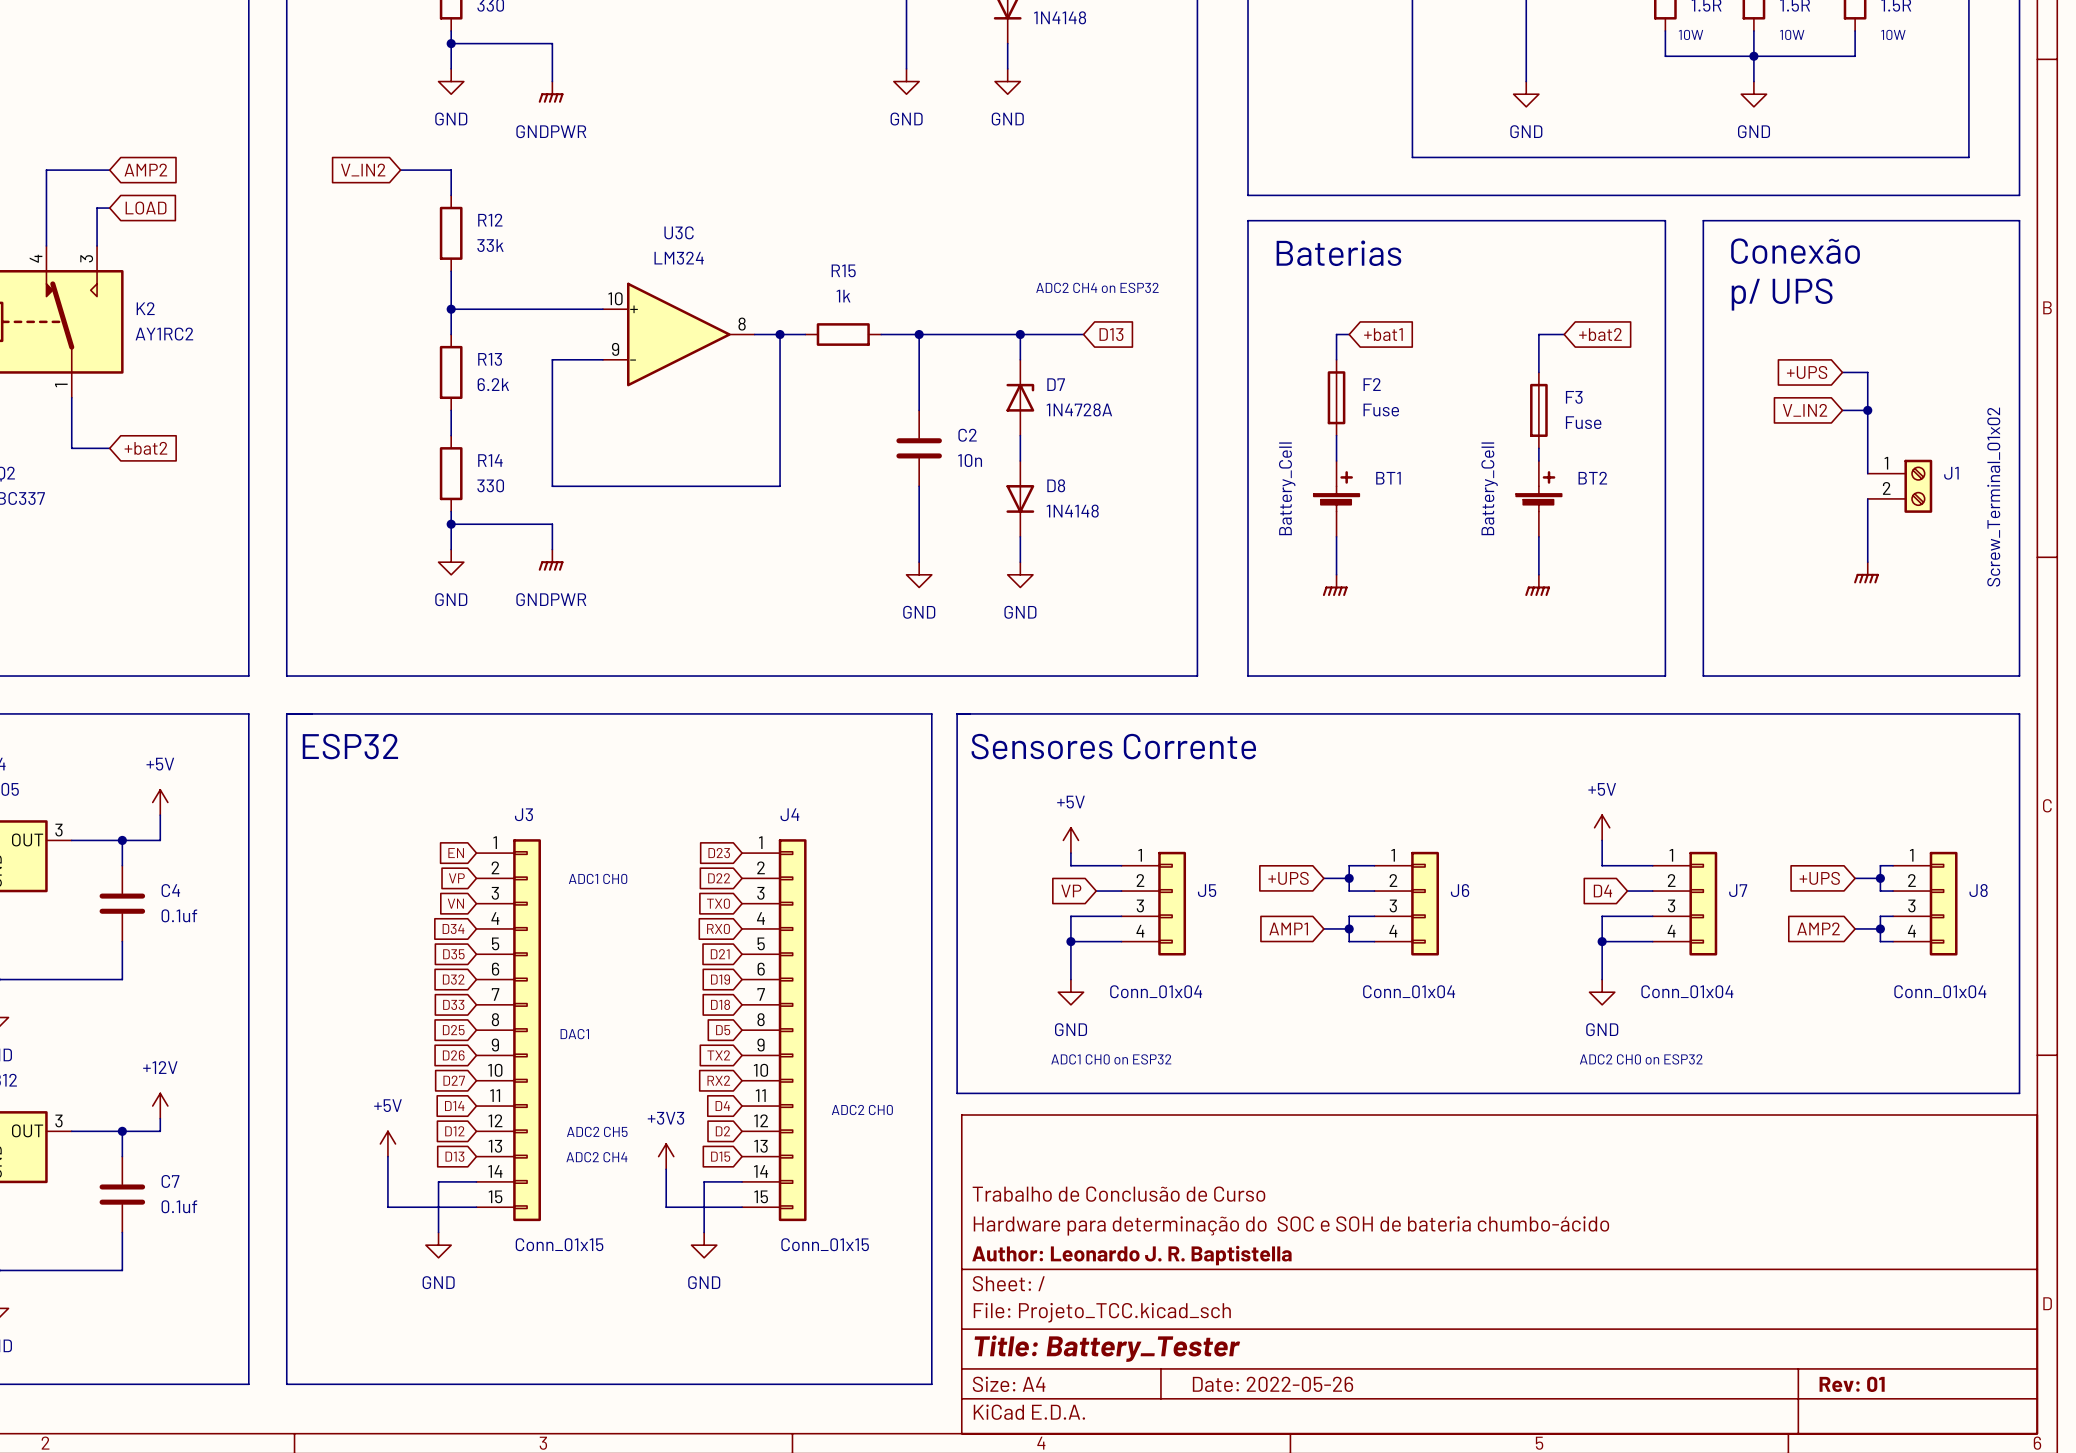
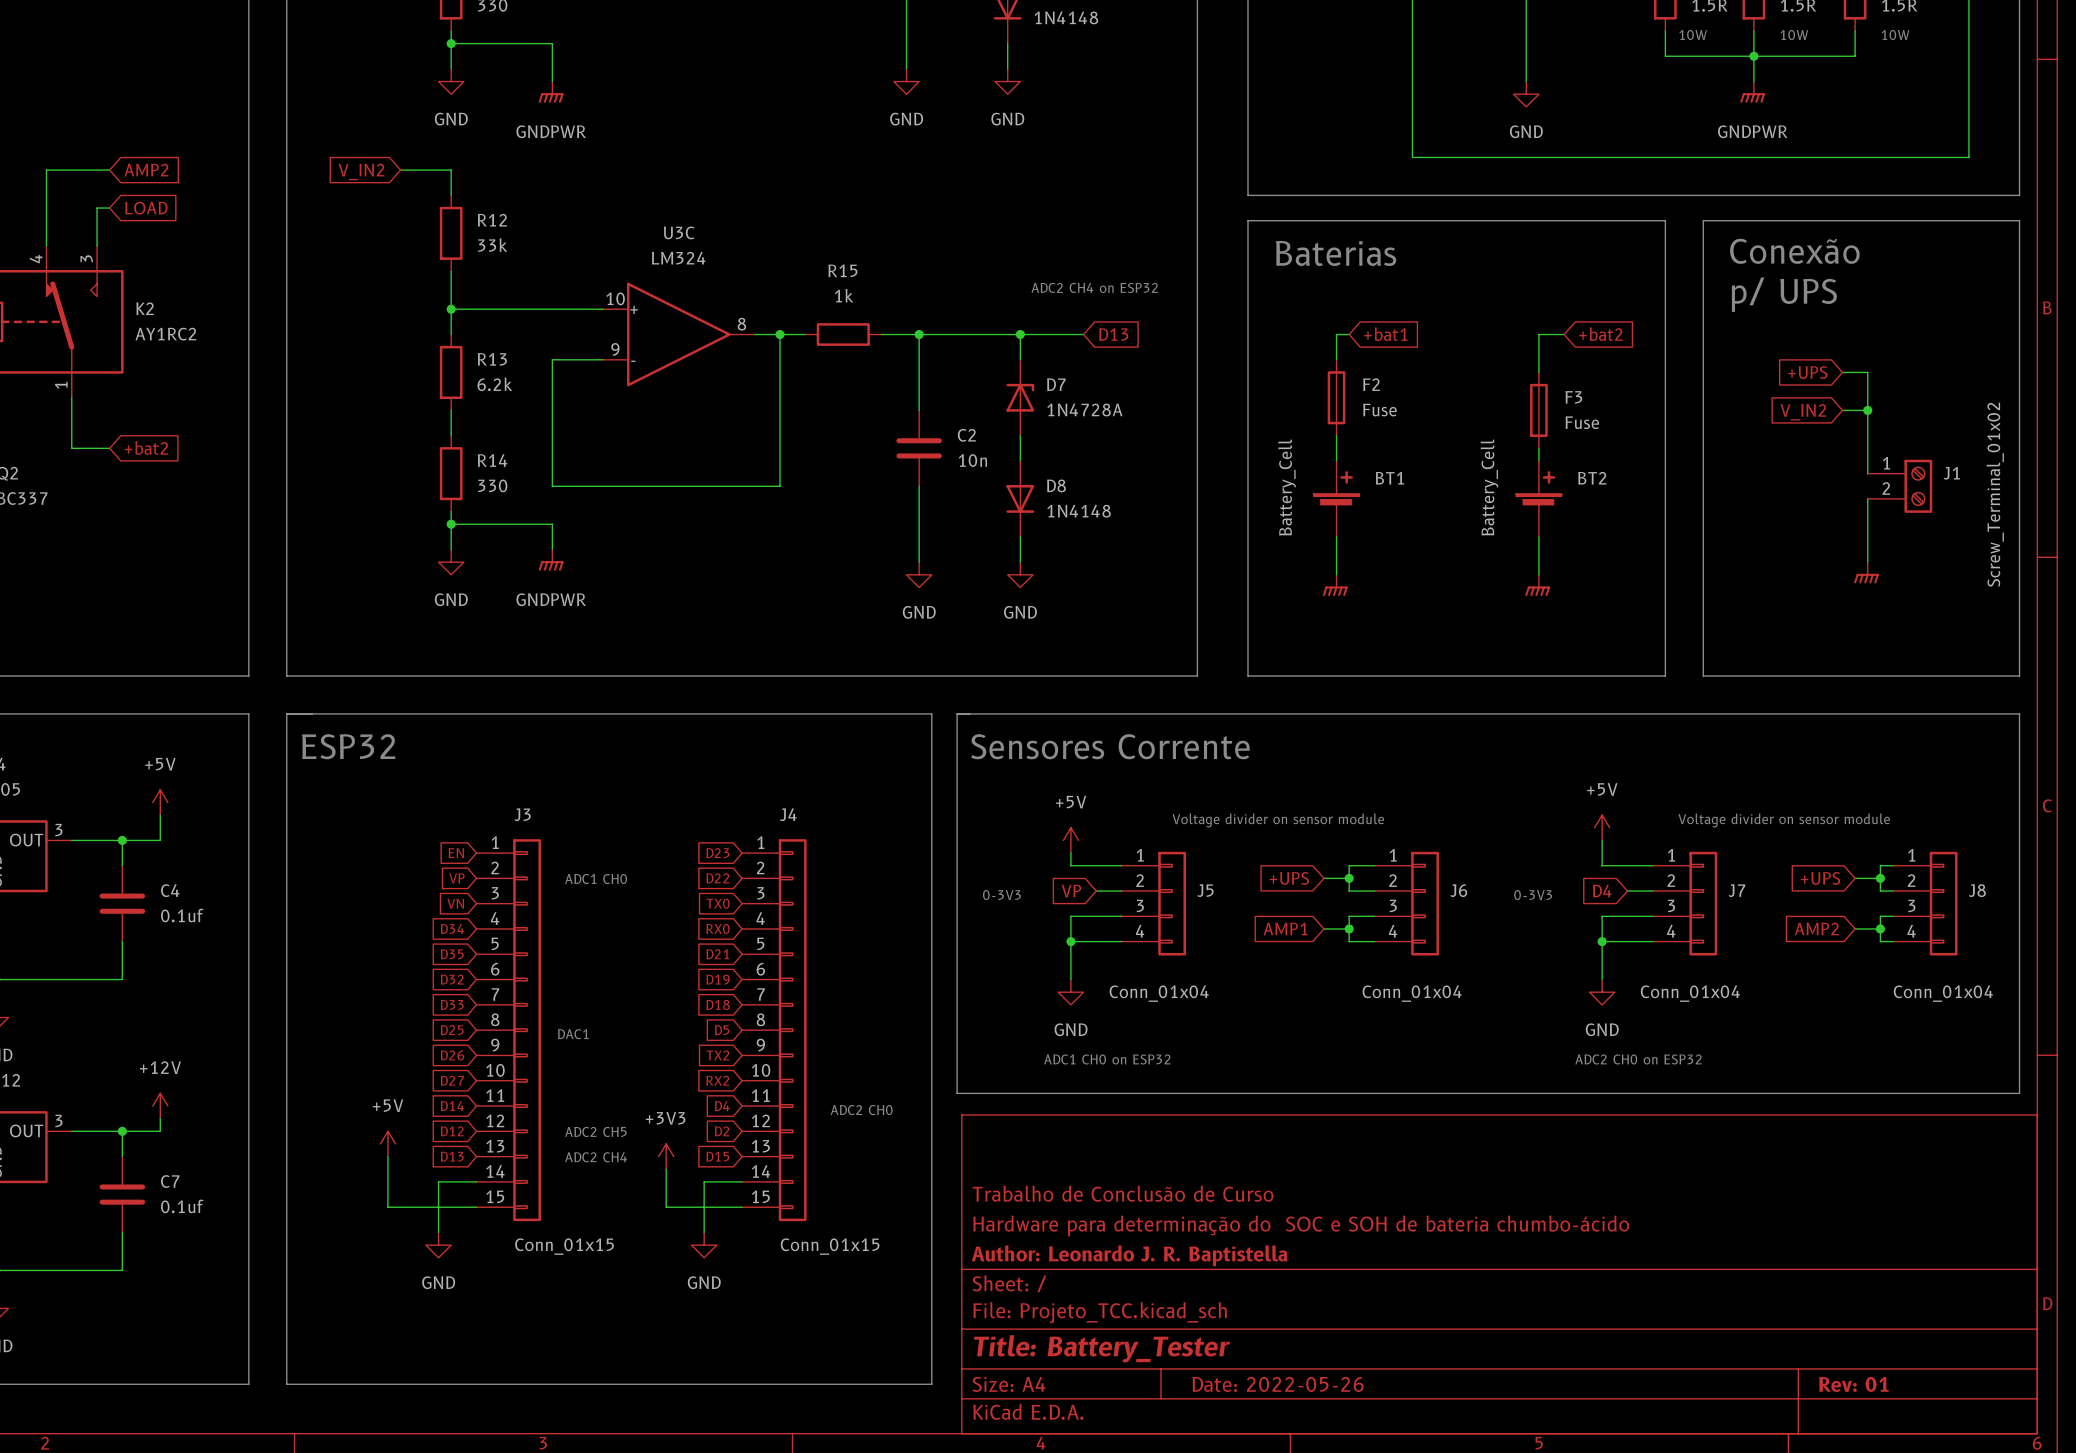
power symbol: GND (1753, 94) -> GNDPWR (1752, 92)
text: none -> Voltage divider on sensor module (1278, 820)
text: none -> Voltage divider on sensor module (1784, 820)
text: none -> 0-3V3 (1001, 895)
text: none -> 0-3V3 (1533, 895)

